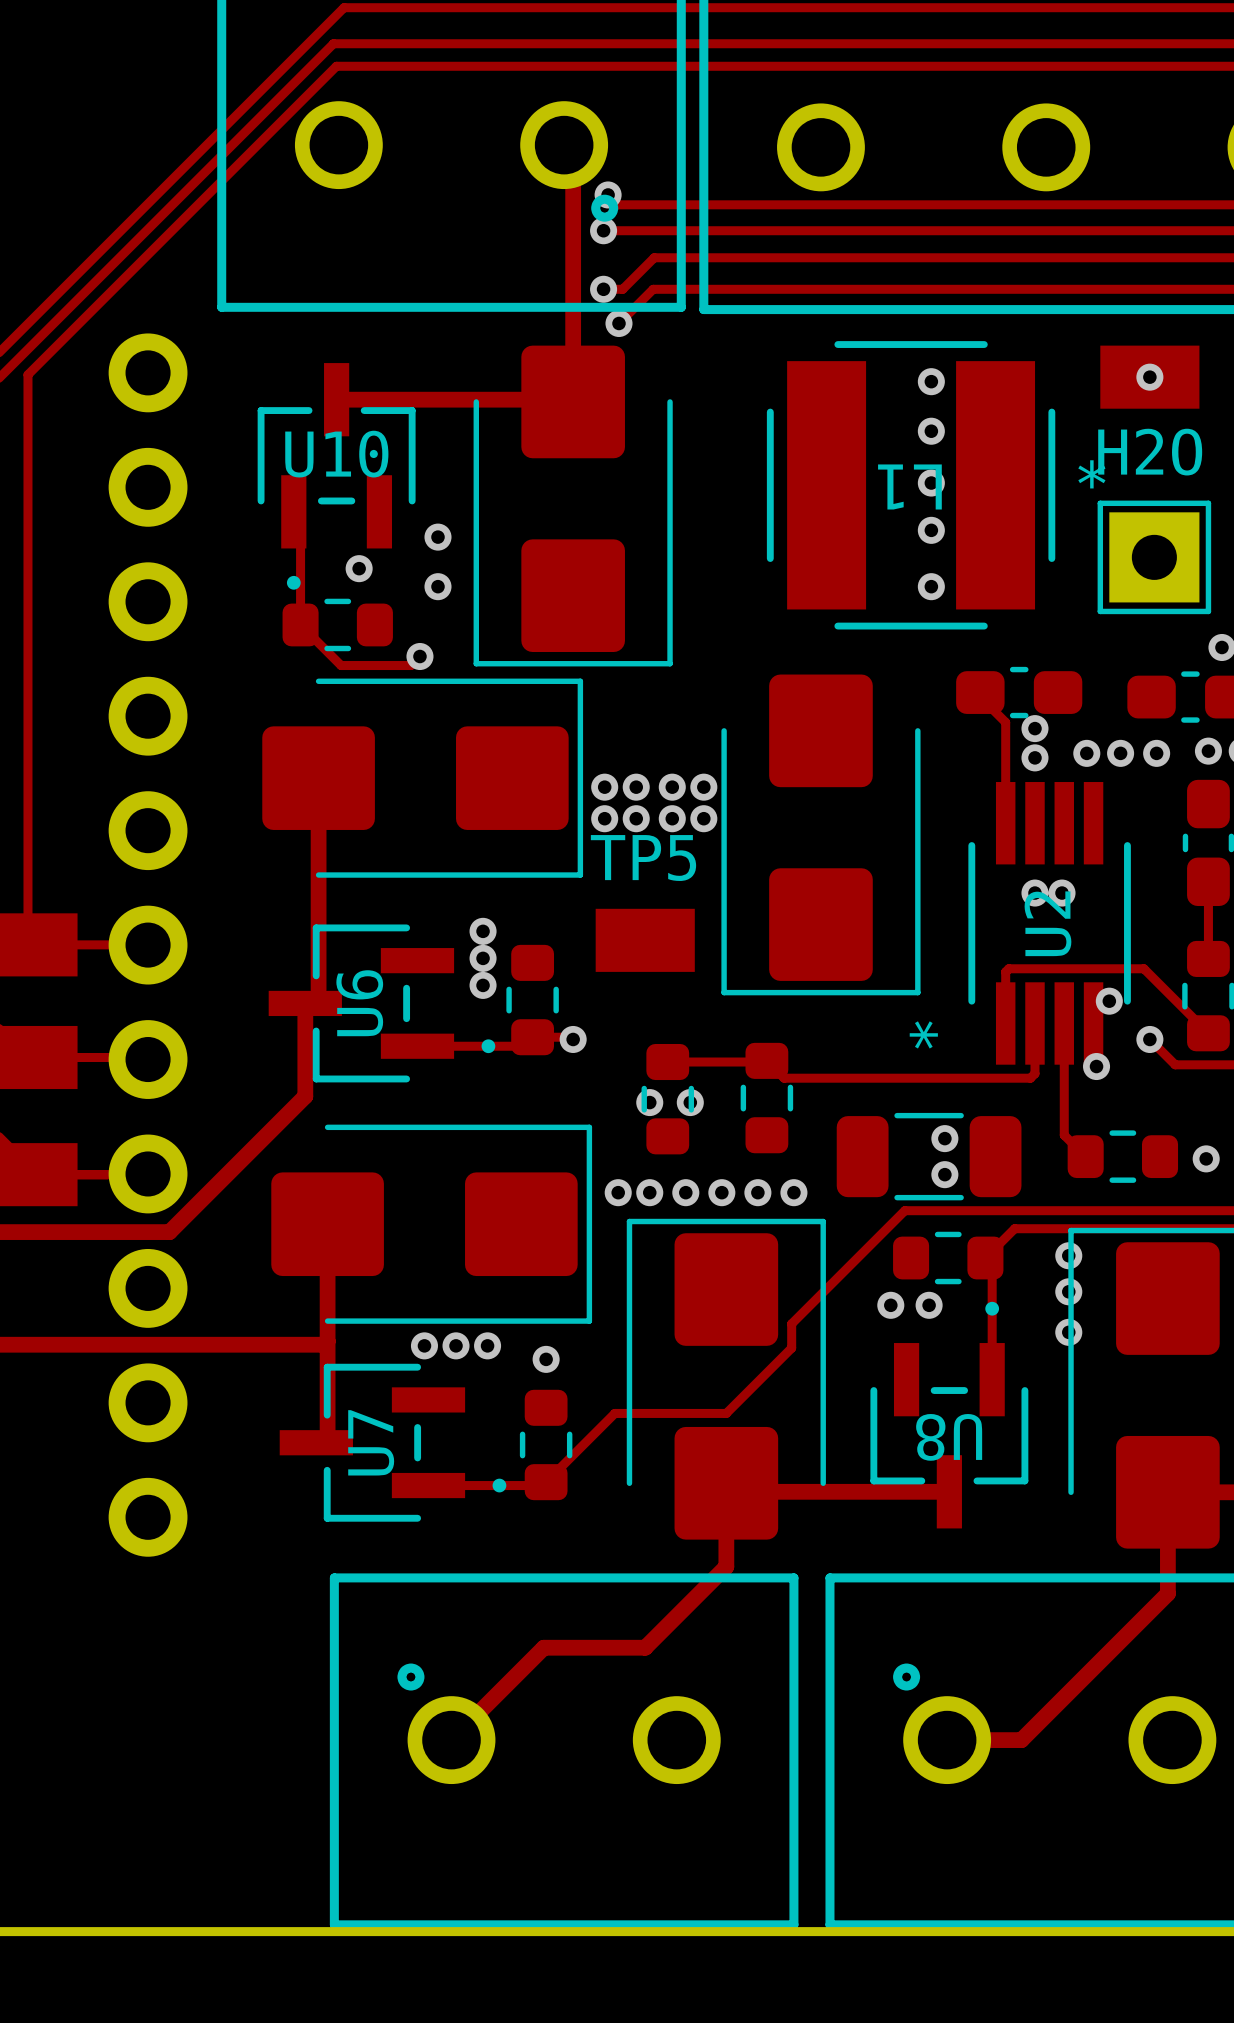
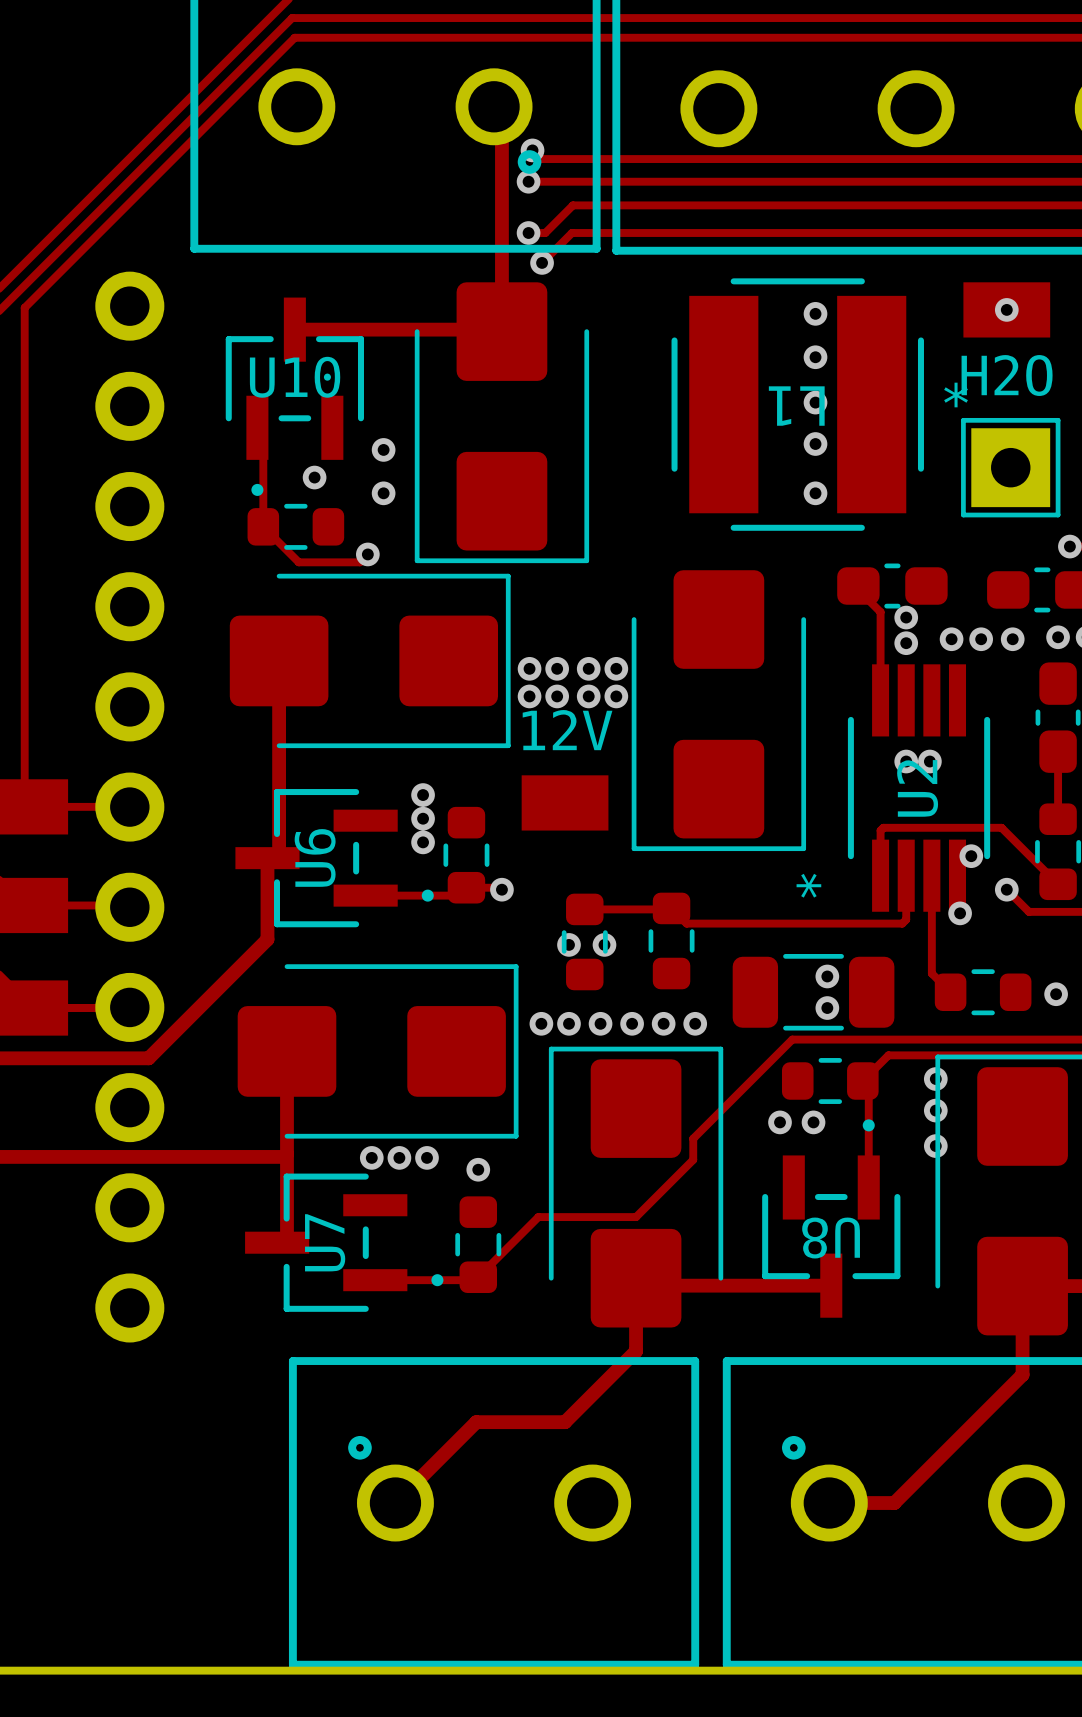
TP5 name: TP5 (643, 858) -> 12V (567, 730)

